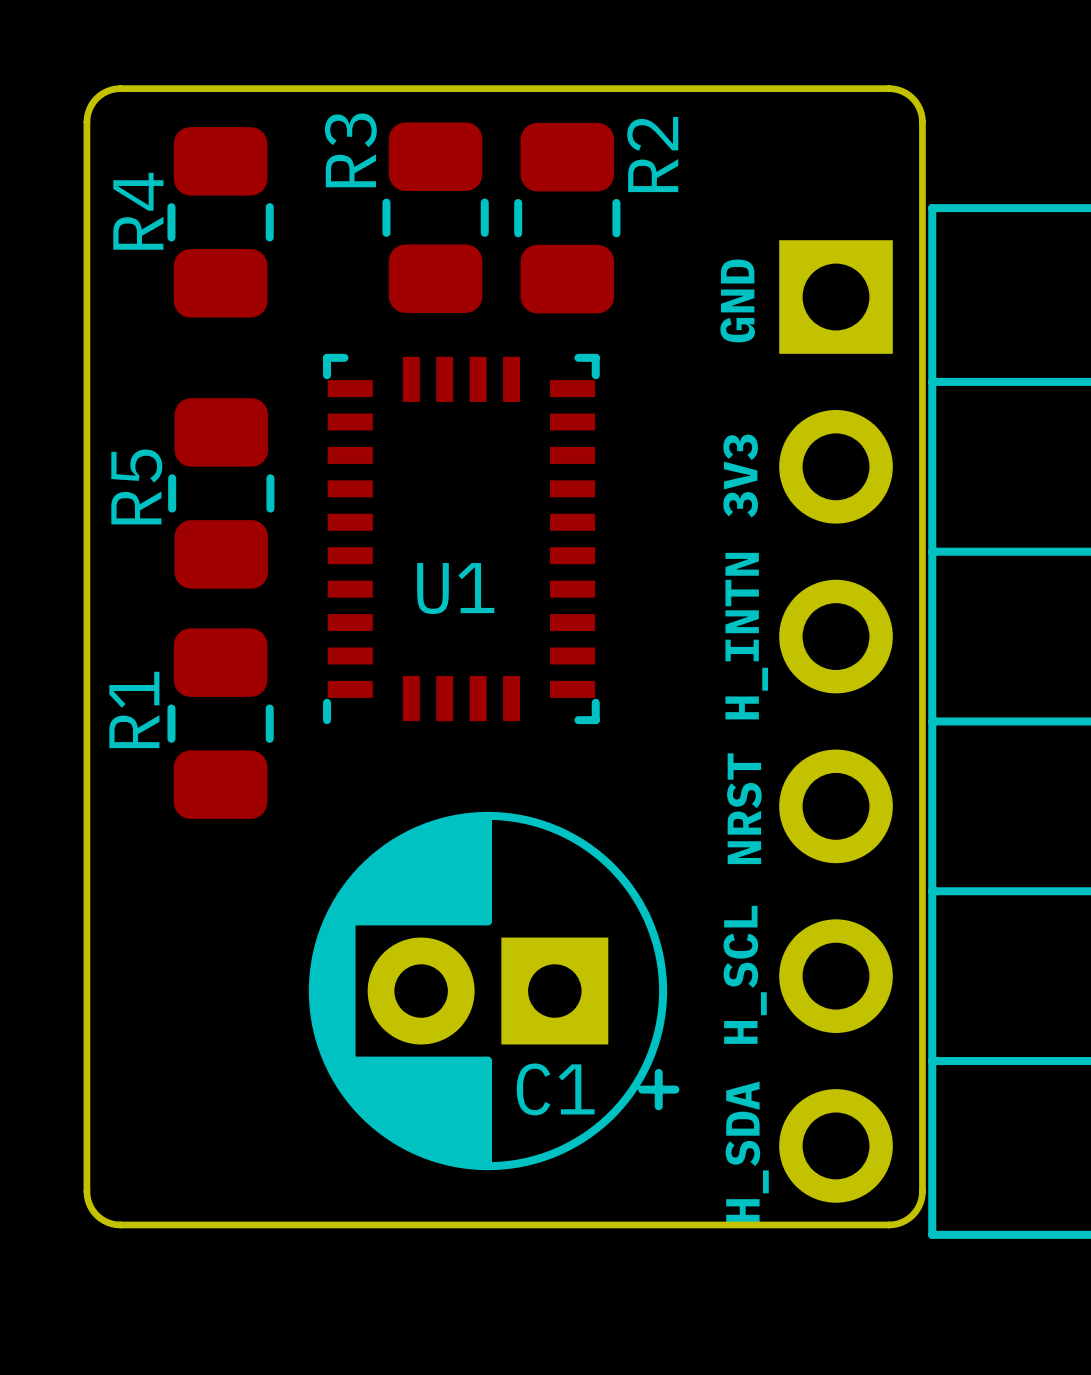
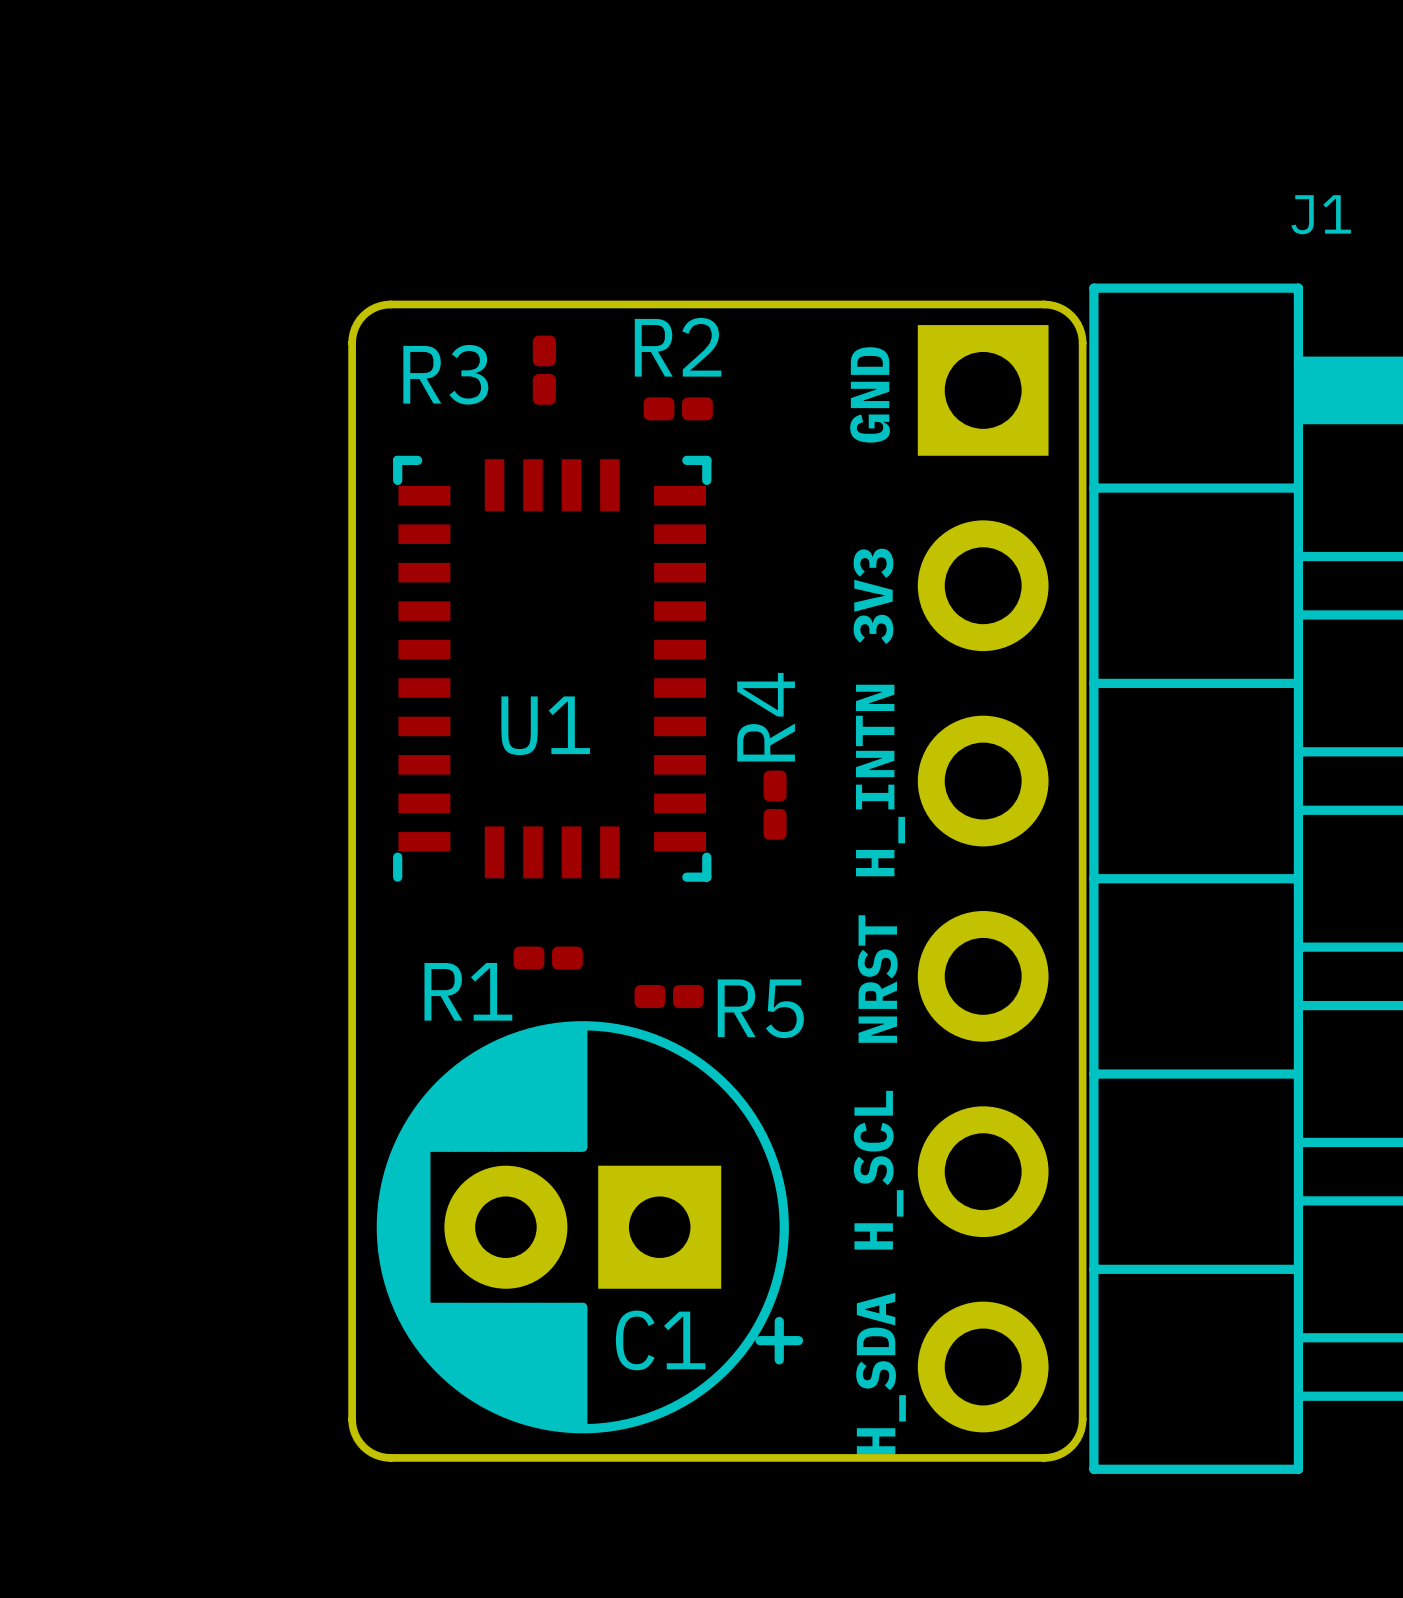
R3 footprint: [382, 122, 489, 313] -> [532, 335, 556, 405]
R2 footprint: [514, 122, 621, 314] -> [643, 397, 713, 421]
R4 footprint: [167, 127, 274, 318] -> [763, 770, 787, 840]
board edge: (922, 255) (922, 117) (919, 109) (912, 98) (901, 91) (893, 88) (120, 88) (103, 93) (91, 105) (86, 122) (88, 1200) (93, 1211) (99, 1218) (115, 1224) (320, 1224) -> (1082, 342) (1079, 328) (1071, 315) (1058, 307) (1044, 304) (390, 304) (371, 309) (357, 323) (352, 342) (352, 1419) (355, 1434) (363, 1446) (375, 1454) (390, 1457)
R5 footprint: [168, 398, 275, 589] -> [634, 985, 704, 1009]
R5 name position: R5 (136, 486) -> R5 (760, 1008)
R1 footprint: [167, 628, 274, 819] -> [513, 946, 583, 970]
C1 position: (494, 991) -> (589, 1227)

